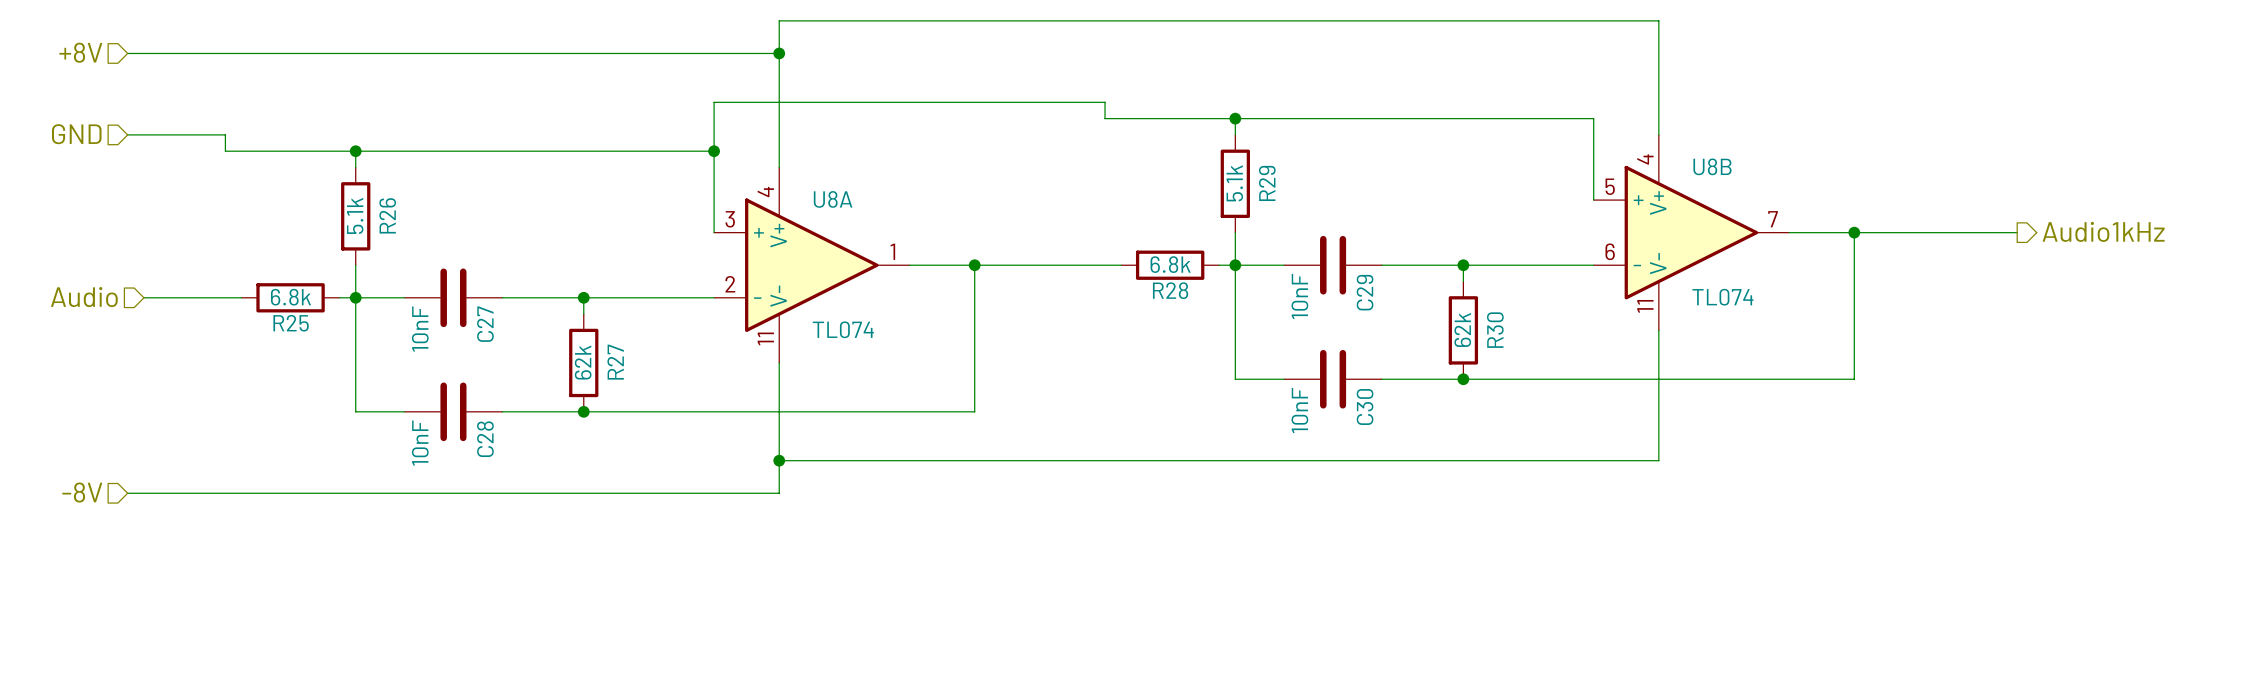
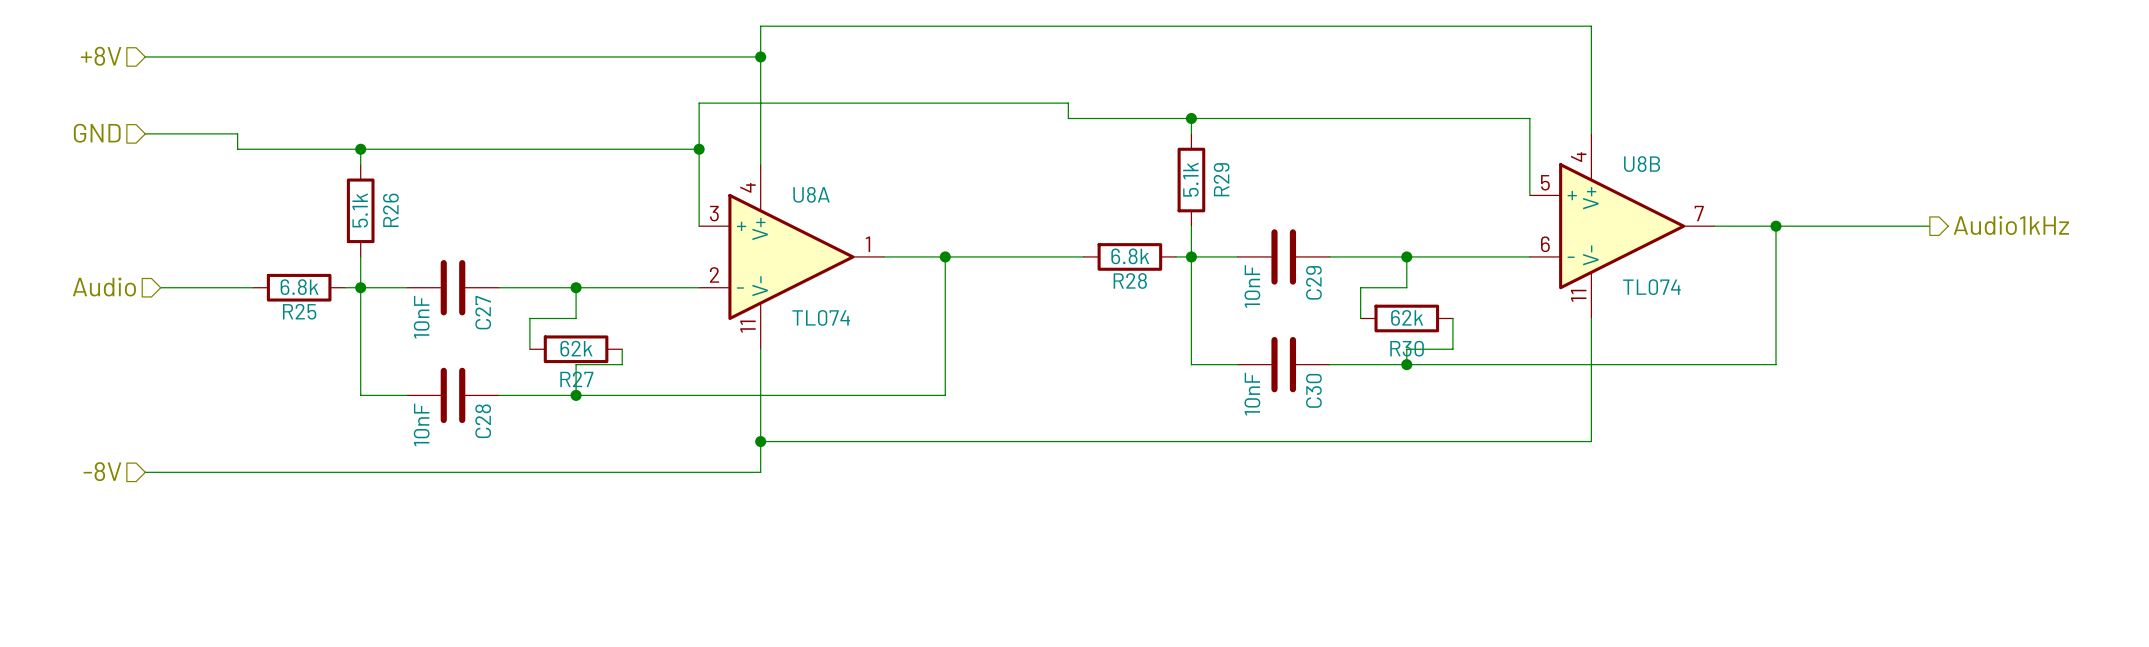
wire: none -> (1406, 272) (1406, 287) (1360, 287) (1360, 318)
wire: none -> (576, 303) (576, 318) (529, 318) (529, 349)
R30 rotation: 0° (1463, 330) -> 90° clockwise (1406, 318)
wire: none -> (1452, 318) (1452, 349) (1406, 349) (1406, 364)
R27 rotation: 0° (583, 362) -> 90° clockwise (576, 349)
wire: none -> (622, 349) (622, 364) (576, 364) (576, 395)

